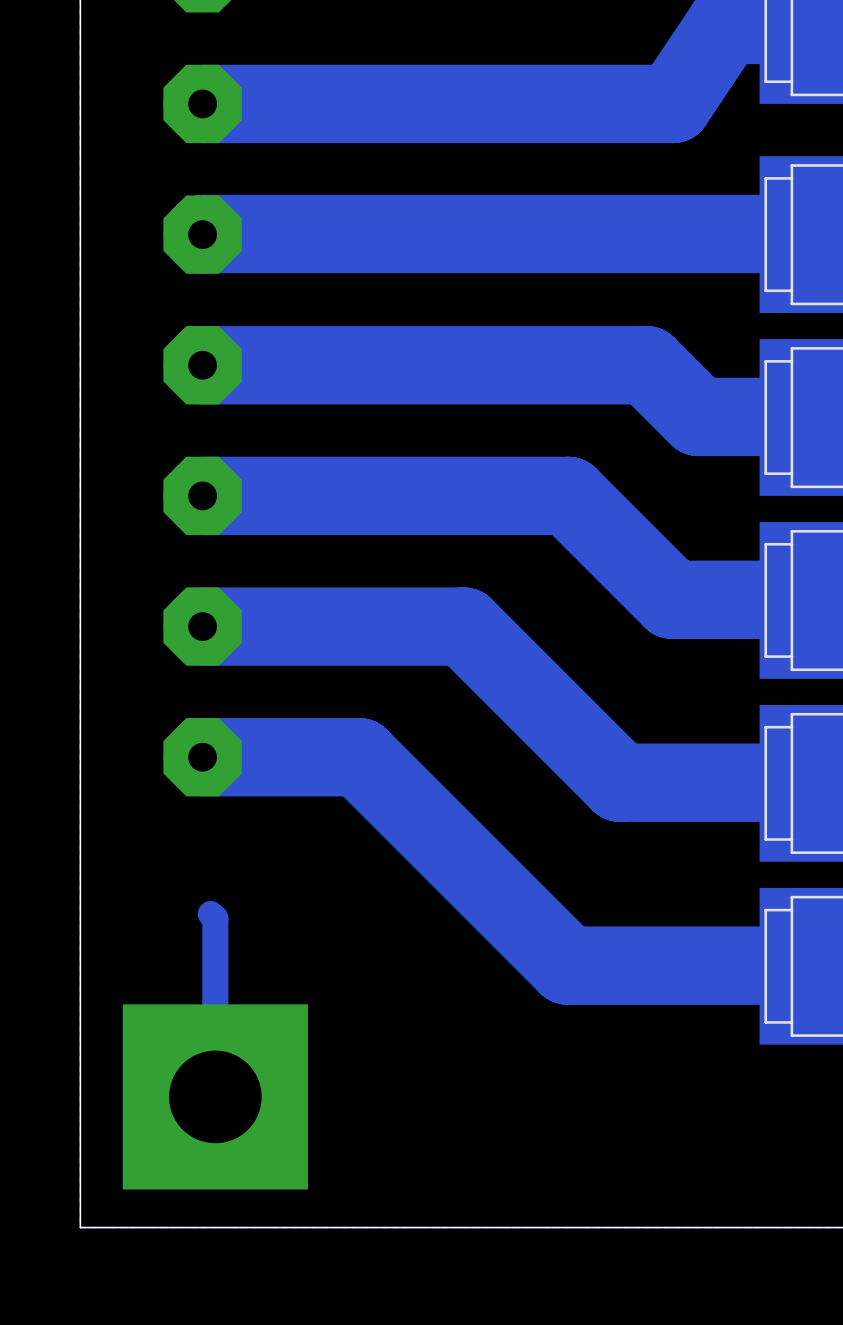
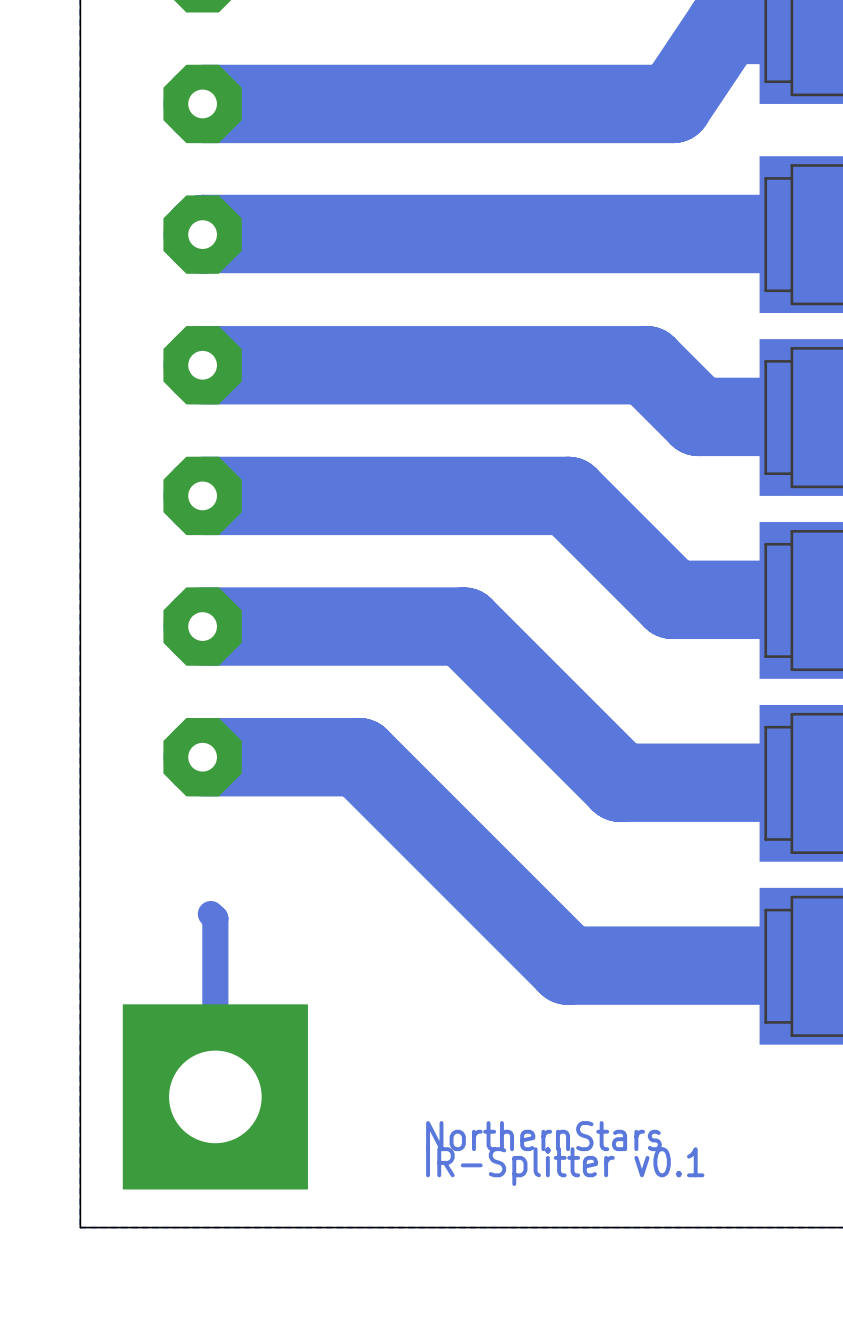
text: none -> NorthernStars (543, 1136)
text: none -> IR-Splitter v0.1 (565, 1166)

